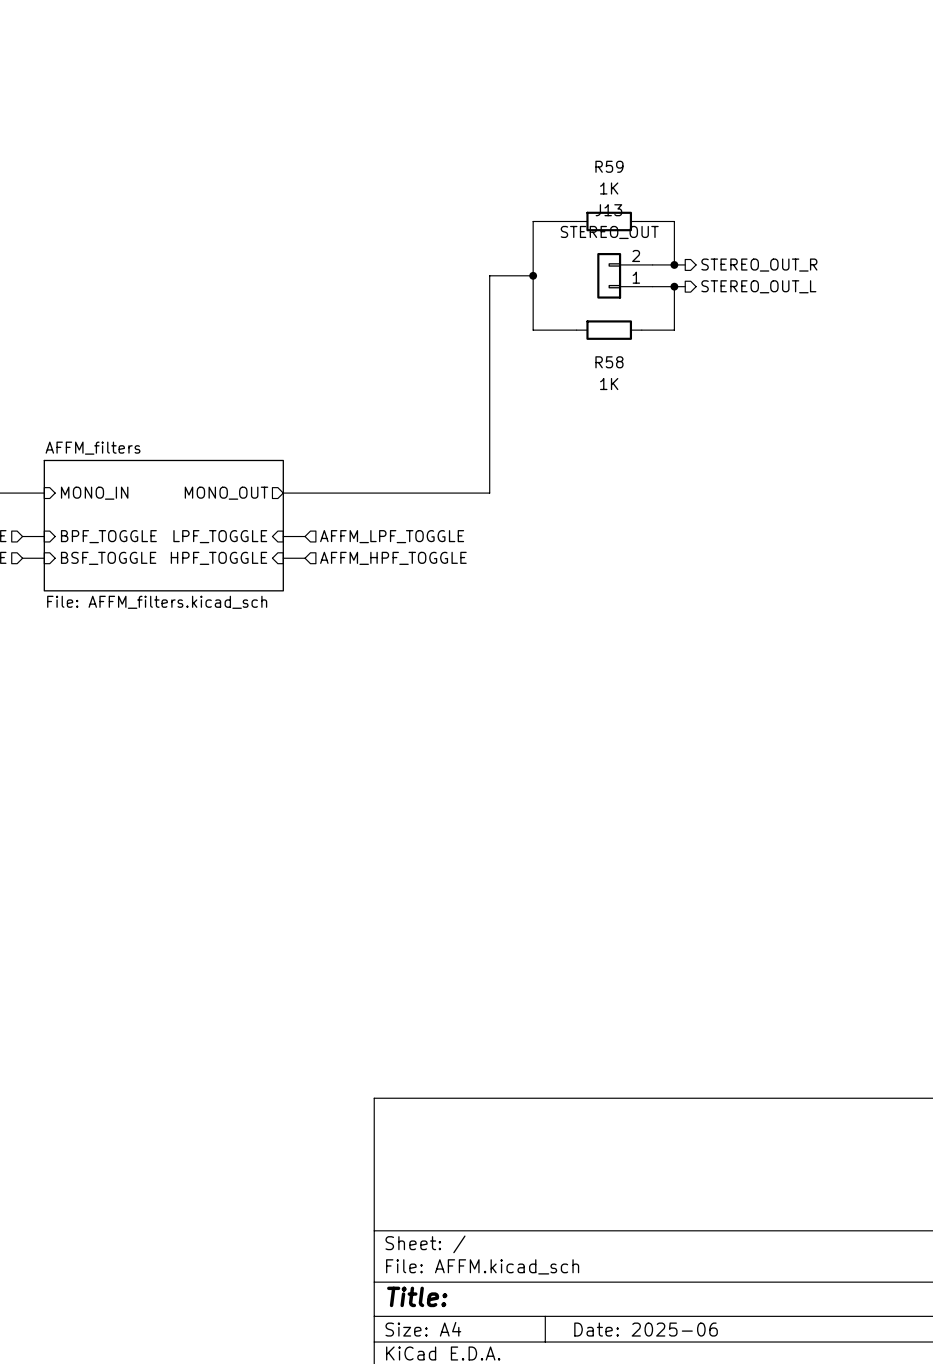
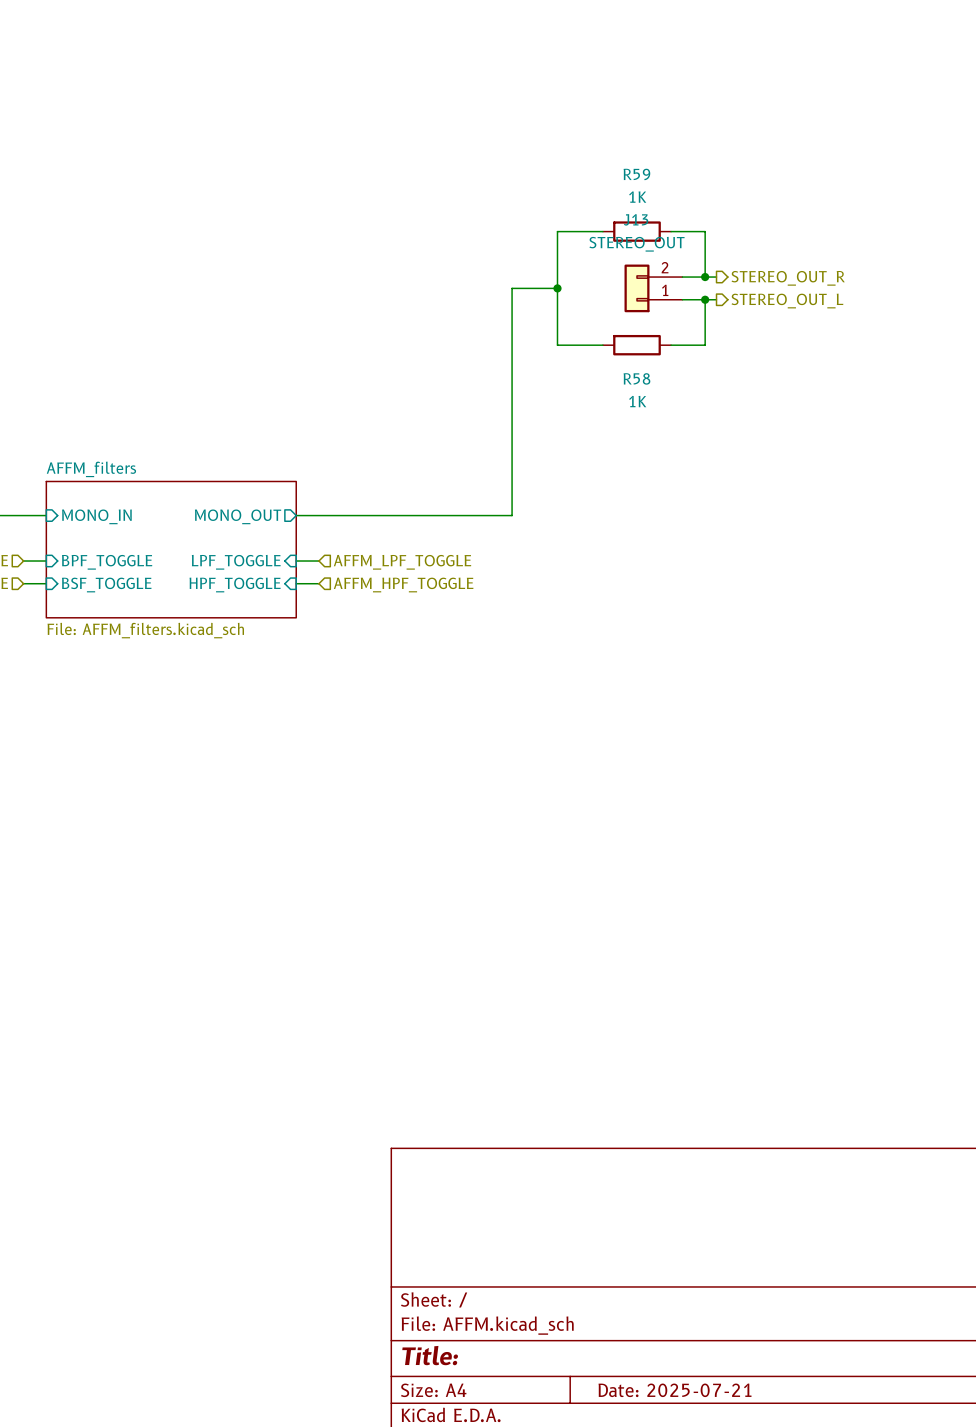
title block: Date: 2025-06 (646, 1329) -> Date: 2025-07-21 (675, 1390)

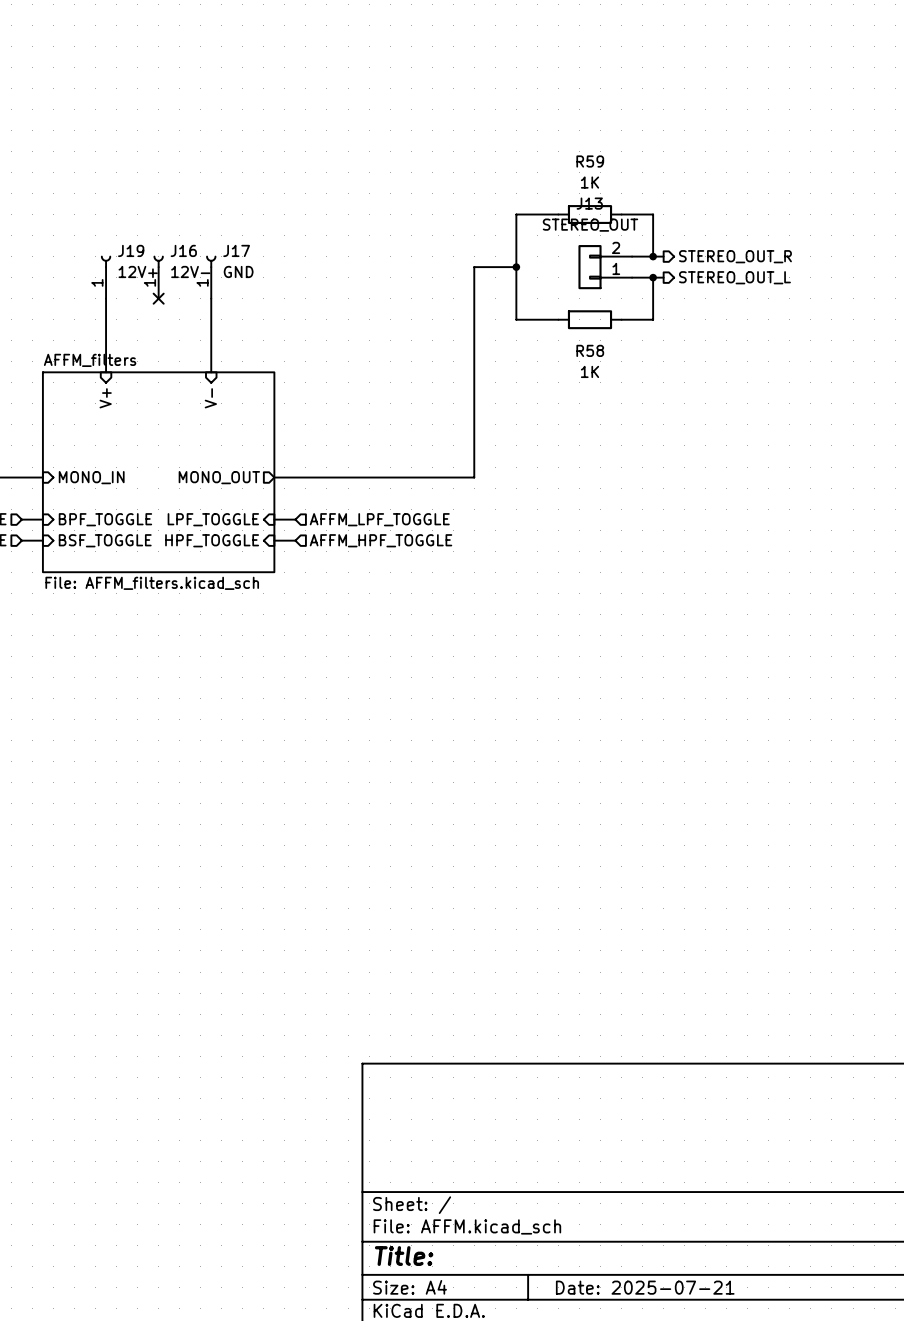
J19: none -> 12V+ (106, 277)
J16: none -> 12V- (158, 277)
J17: none -> GND (211, 277)
wire: none -> (106, 298) (106, 372)
no-connect mark: none -> (158, 298)
wire: none -> (211, 298) (211, 372)
sheet pin: none -> V- (210, 398)
sheet pin: none -> V+ (105, 398)
sheet AFFM_filters: none -> File: AFFM_filters.kicad_sch (158, 472)
sheet AFFM_filters: File: AFFM_filters.kicad_sch (171, 549) -> none

